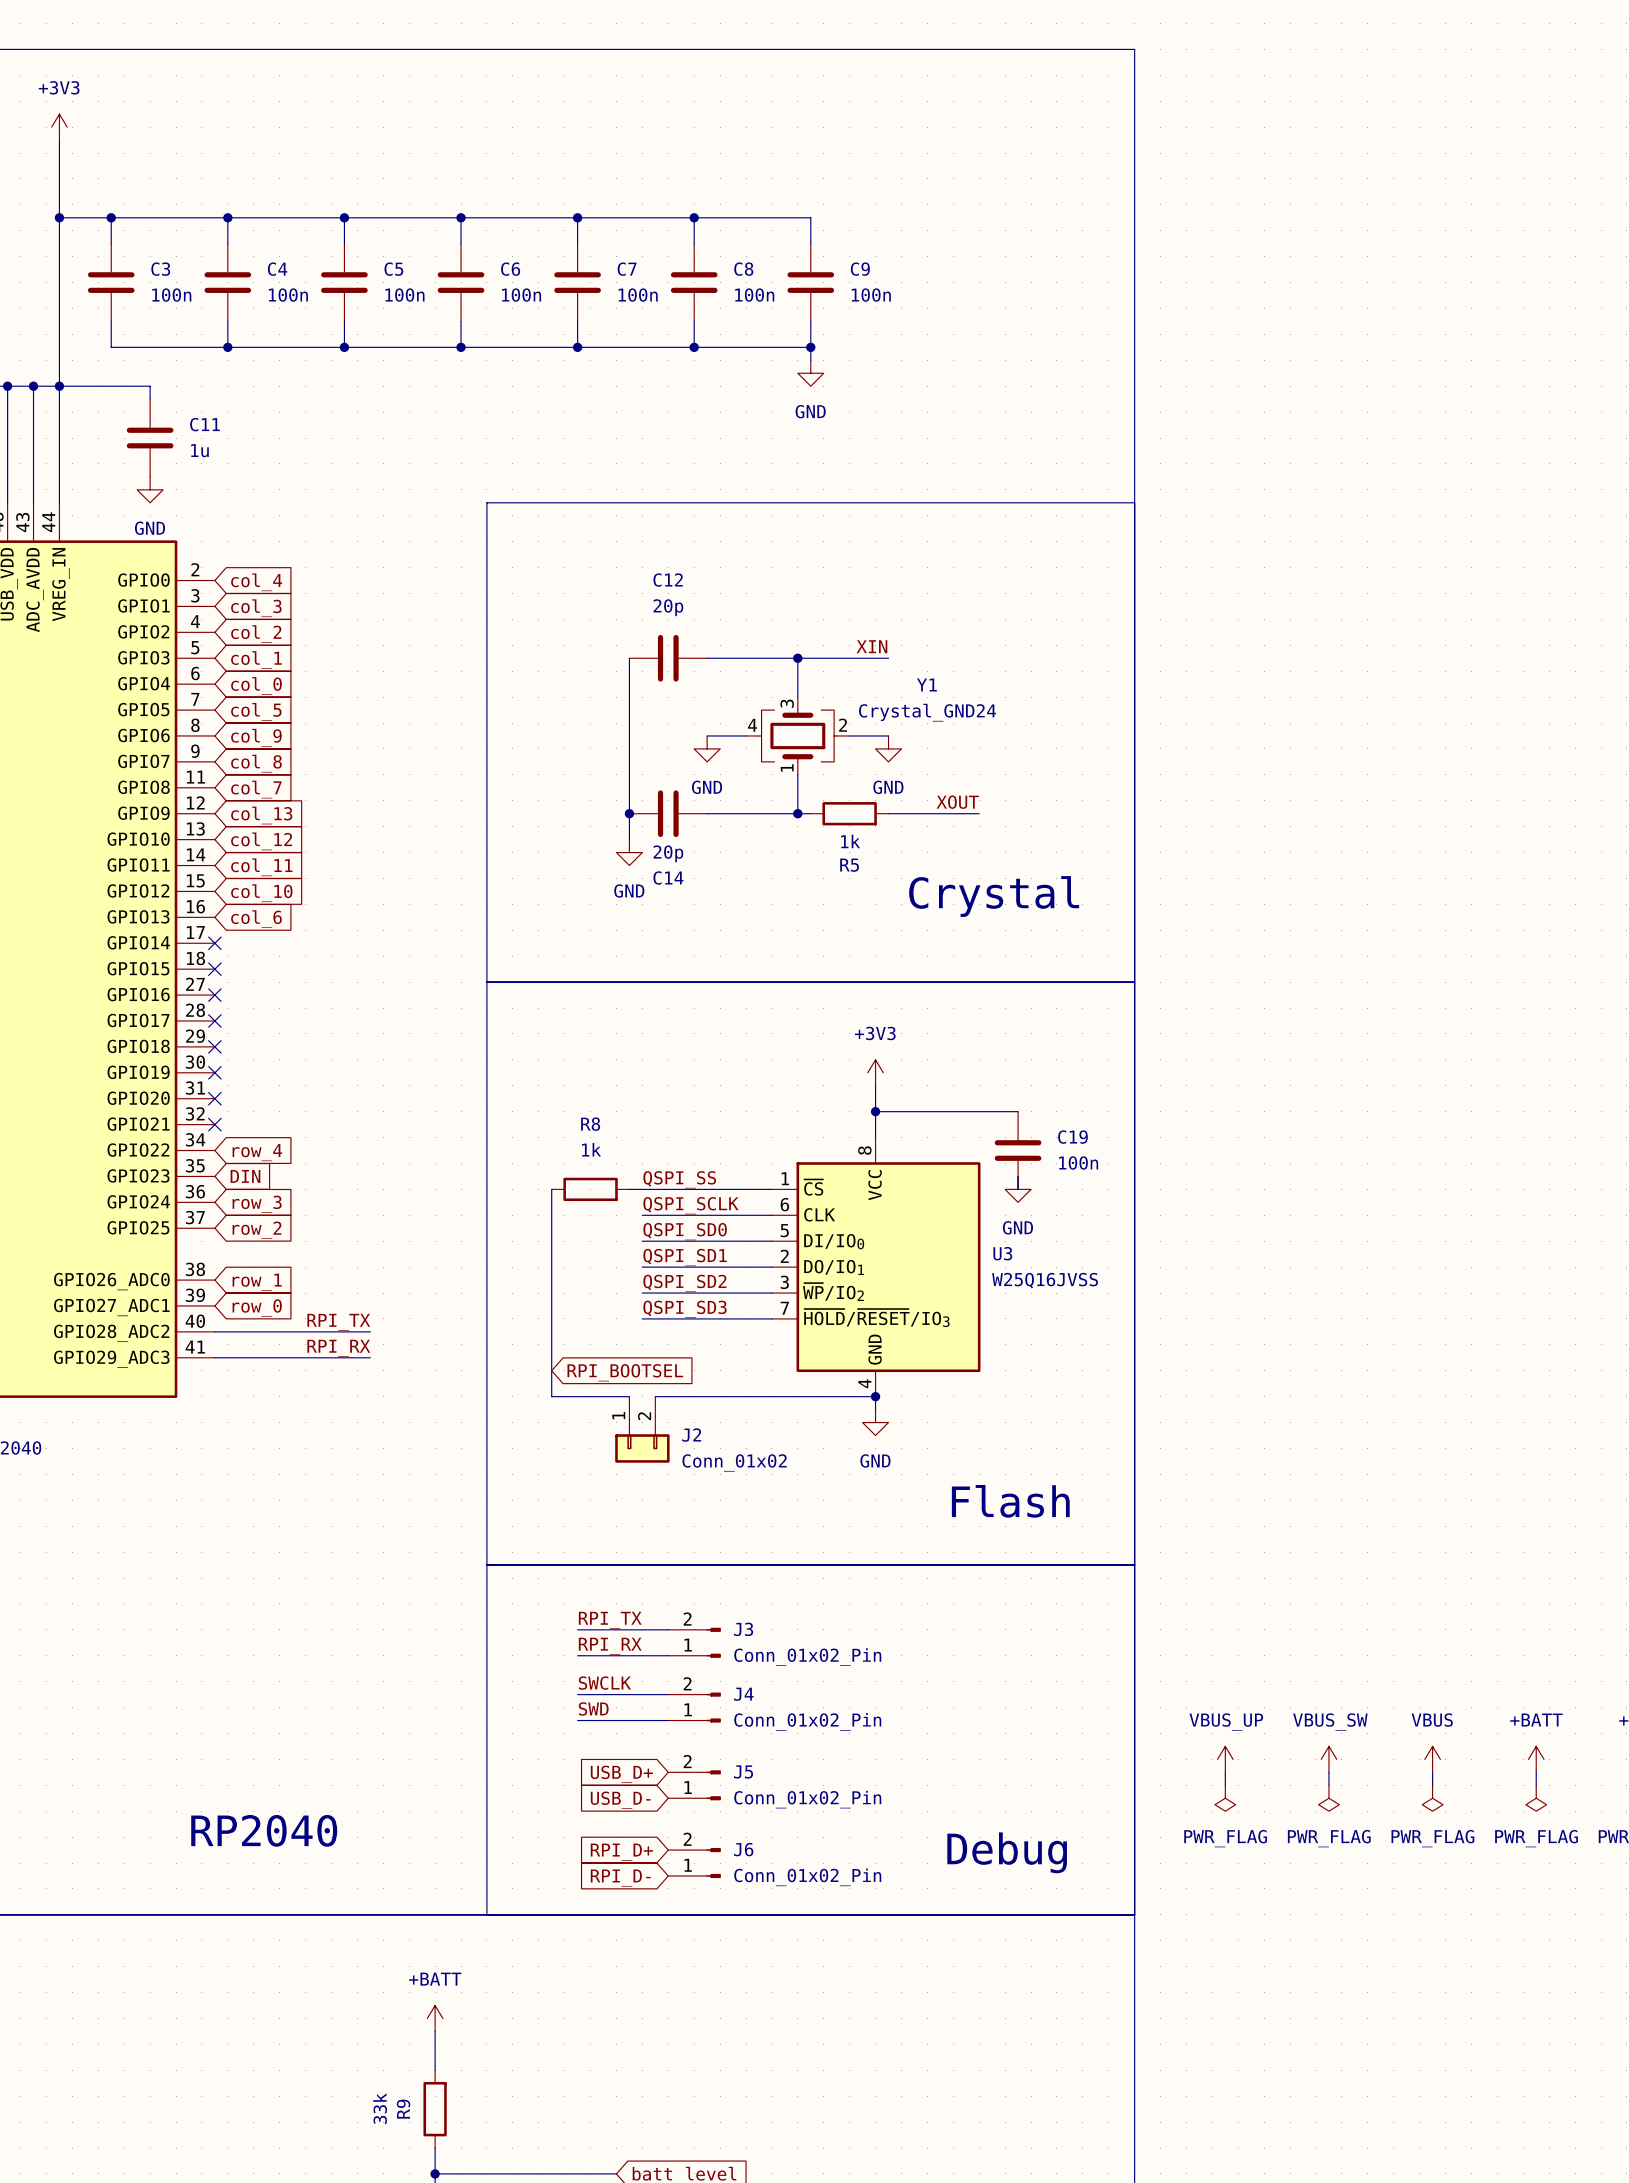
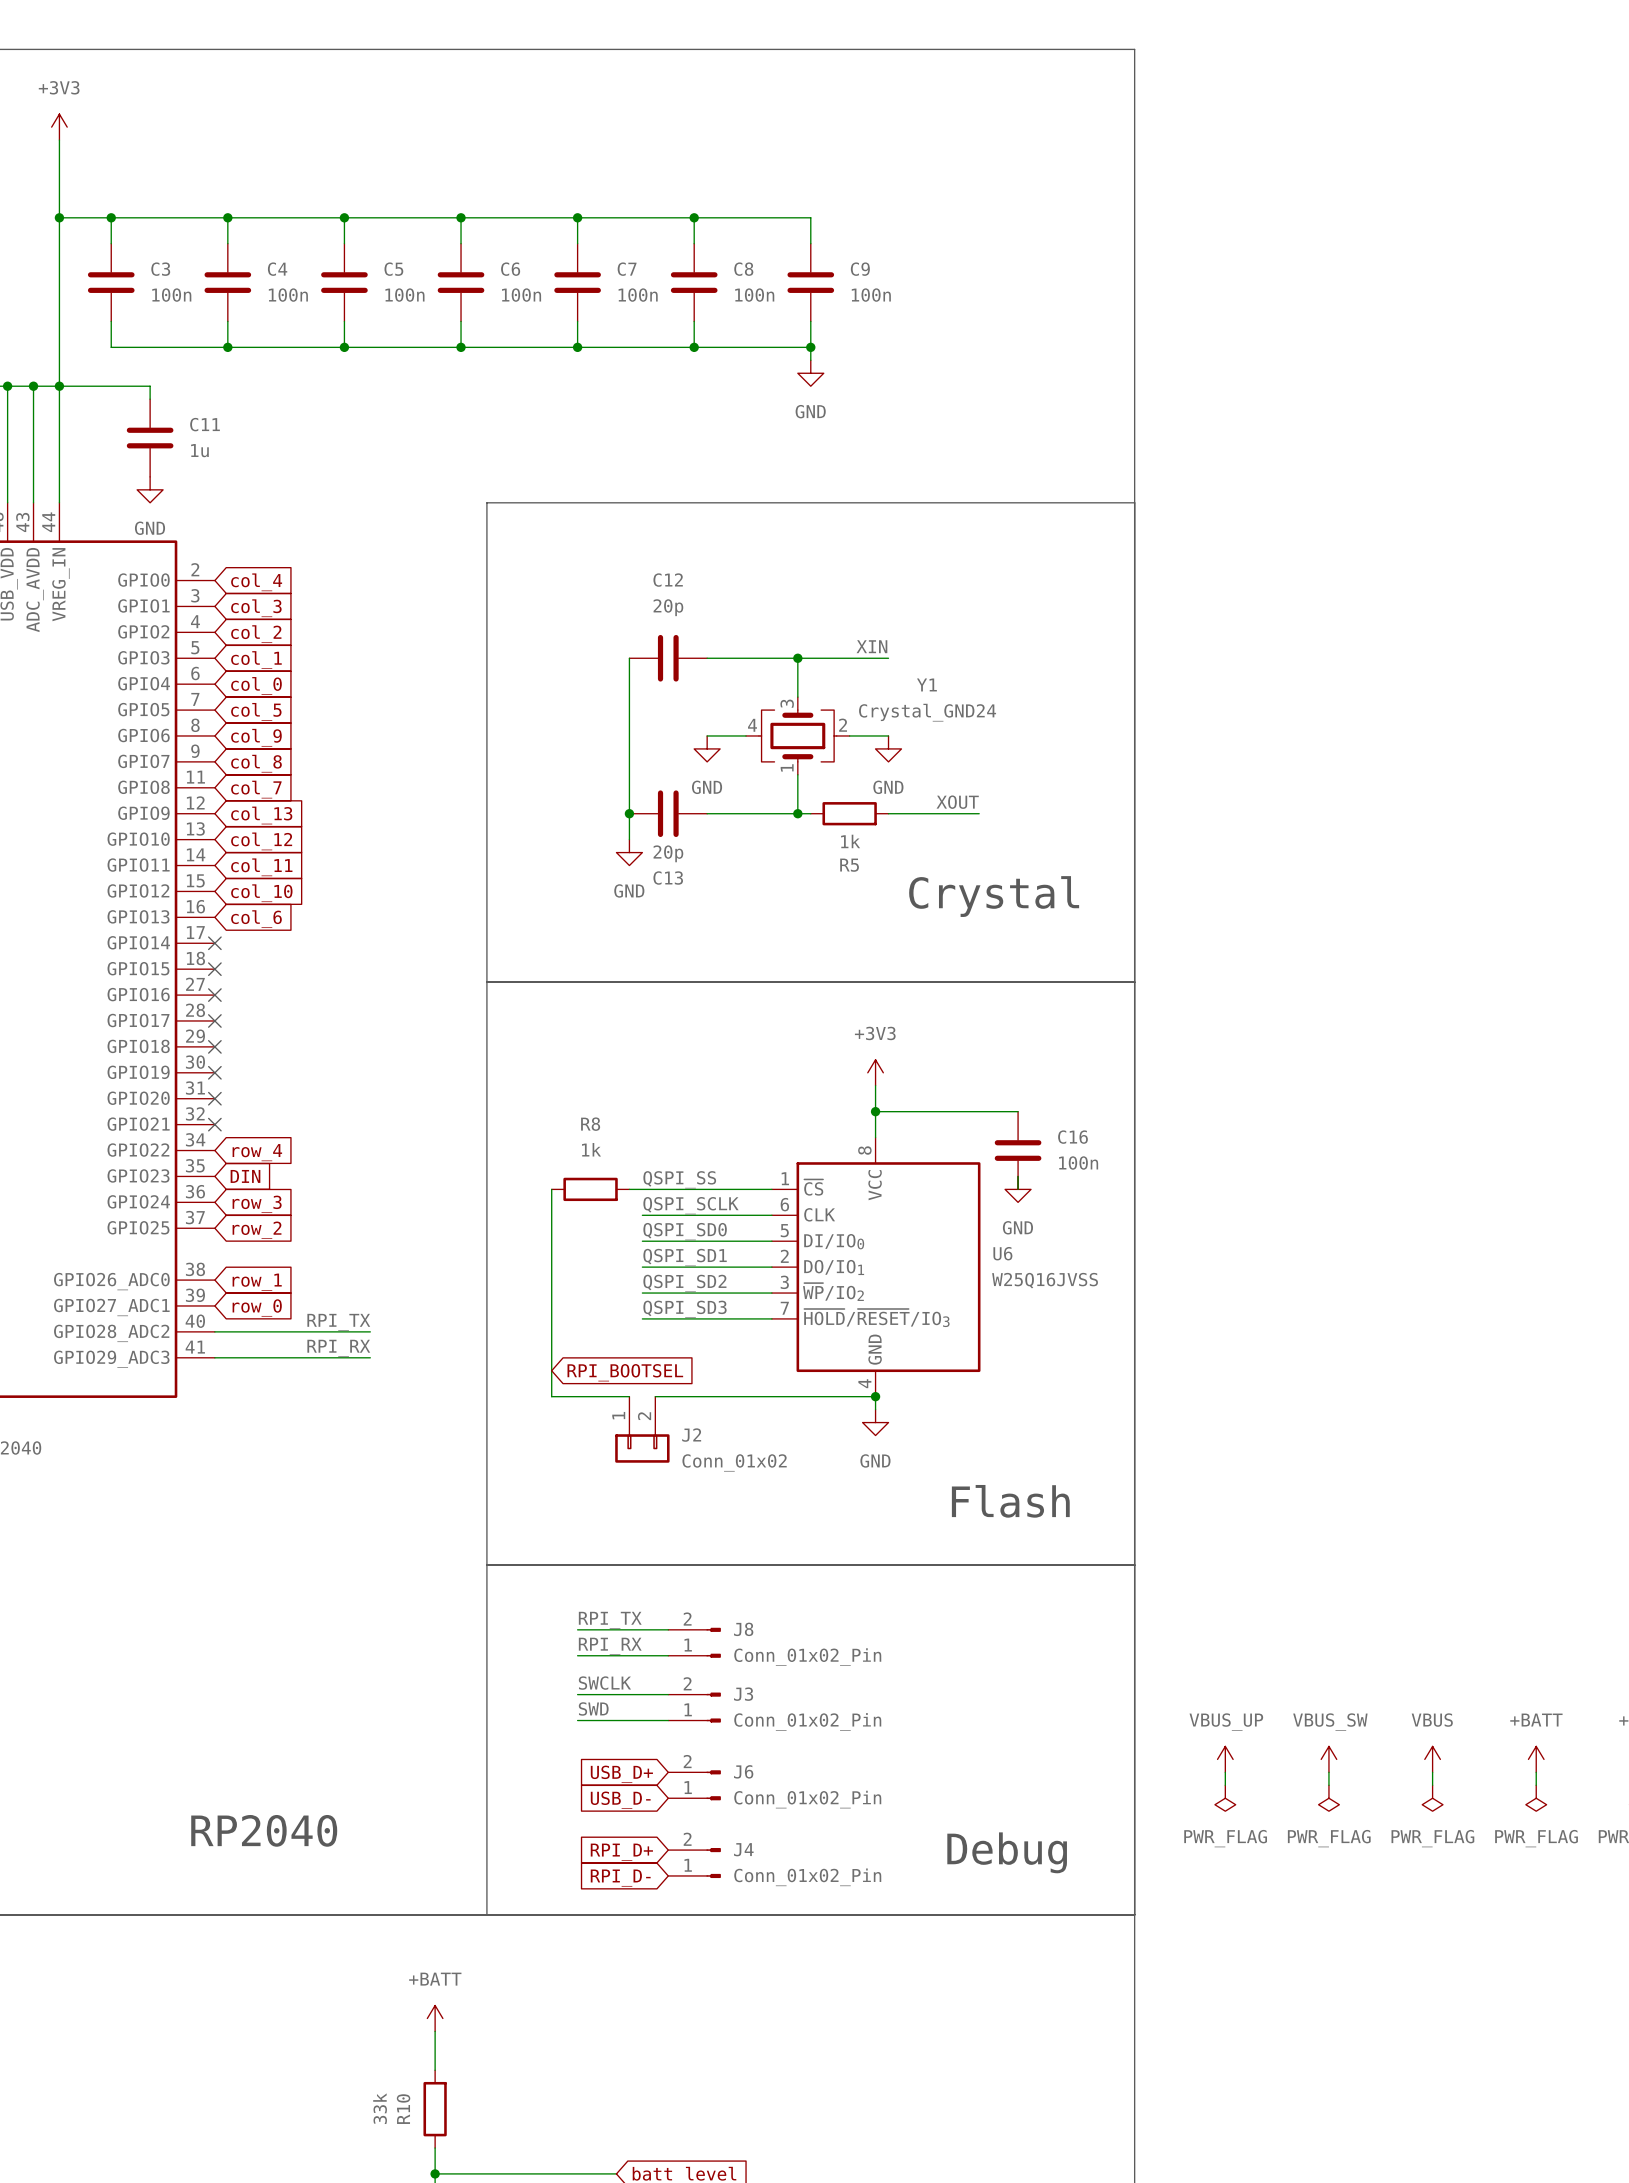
C14 name: C14 (668, 878) -> C13 (668, 878)
C19 name: C19 (1072, 1137) -> C16 (1072, 1137)
U3 name: U3 (1002, 1253) -> U6 (1002, 1253)
J3 name: J3 (743, 1629) -> J8 (743, 1629)
J4 name: J4 (743, 1694) -> J3 (743, 1694)
J5 name: J5 (743, 1771) -> J6 (743, 1771)
J6 name: J6 (743, 1849) -> J4 (743, 1849)
R9 name: R9 (403, 2109) -> R10 (403, 2109)

